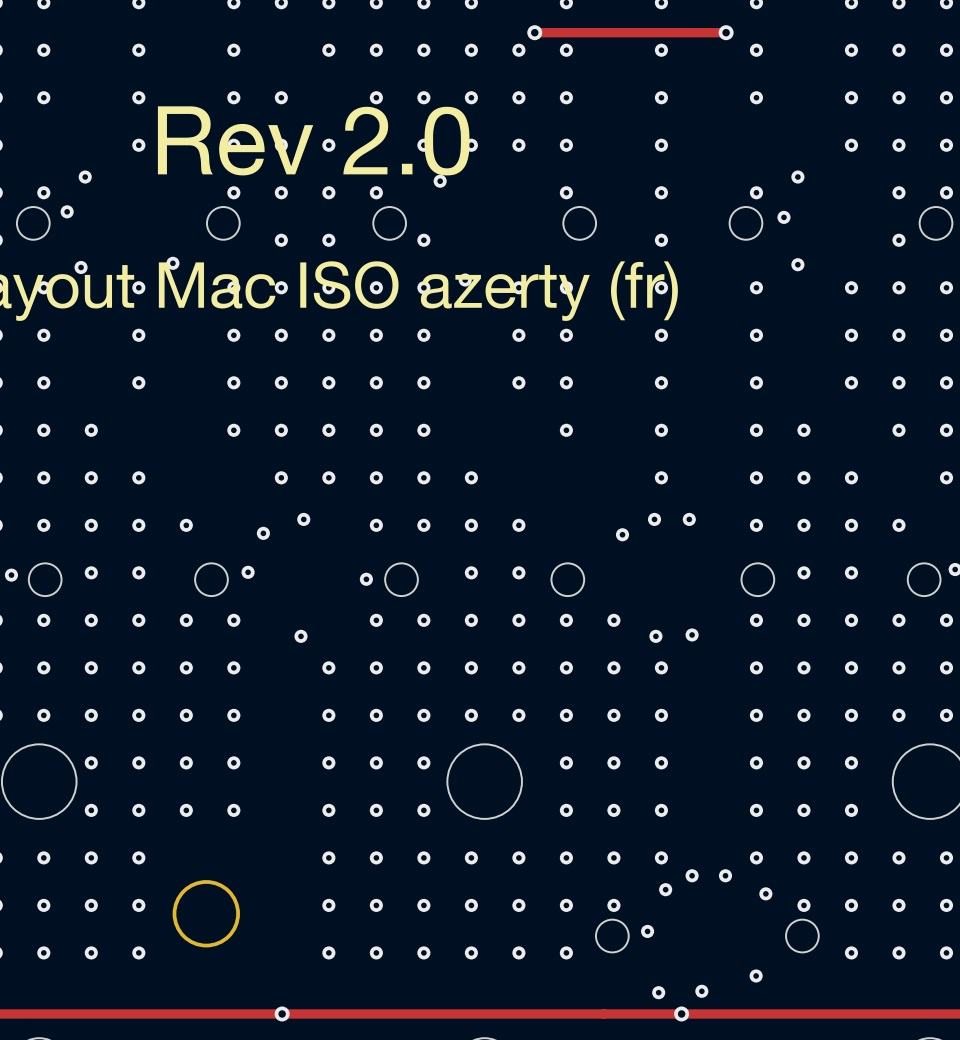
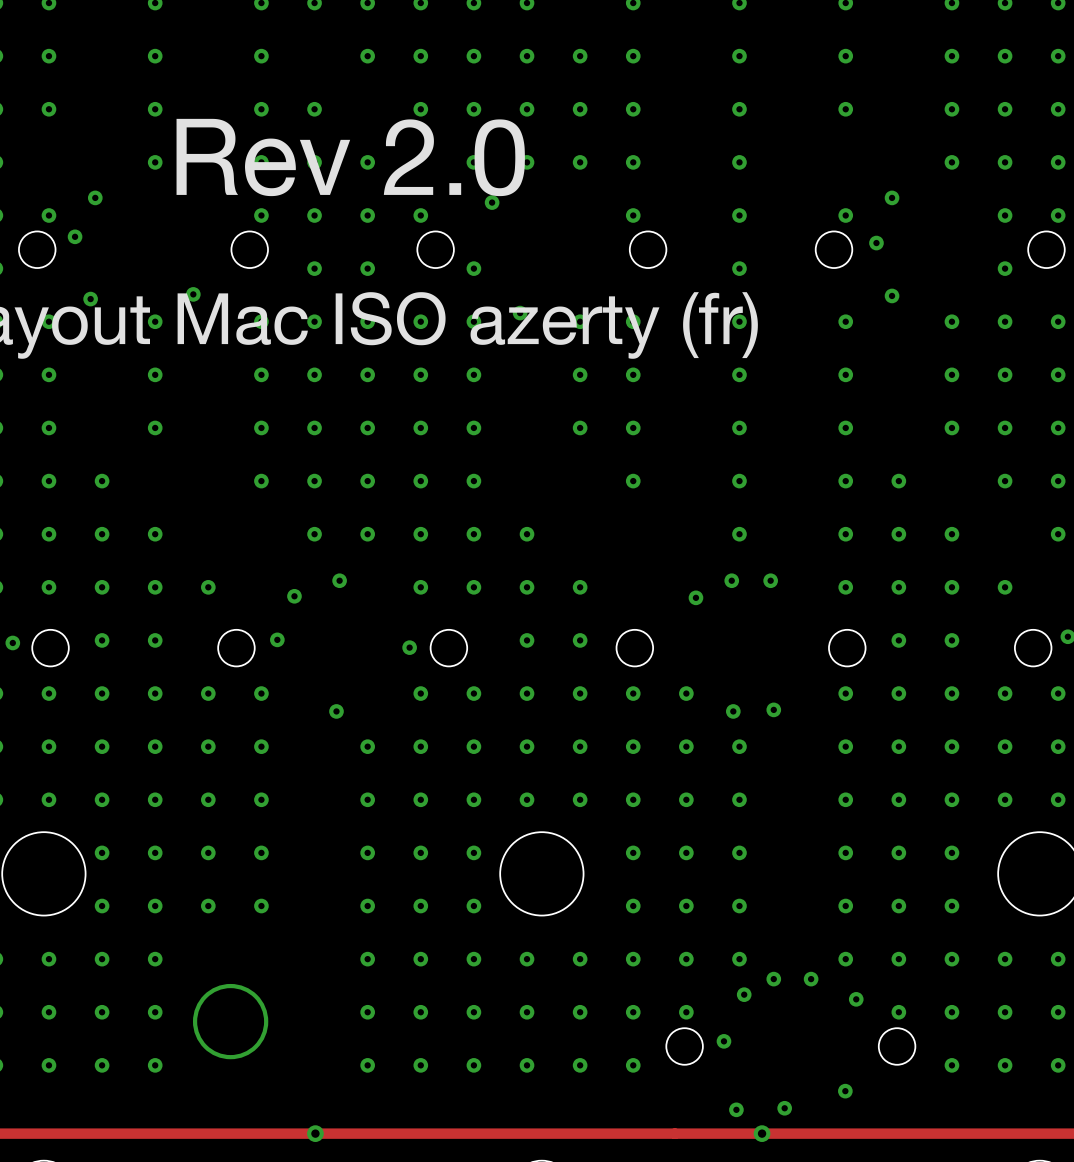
track: (534, 32) (726, 32) -> none
via: (534, 32) -> none
via: (726, 32) -> none

